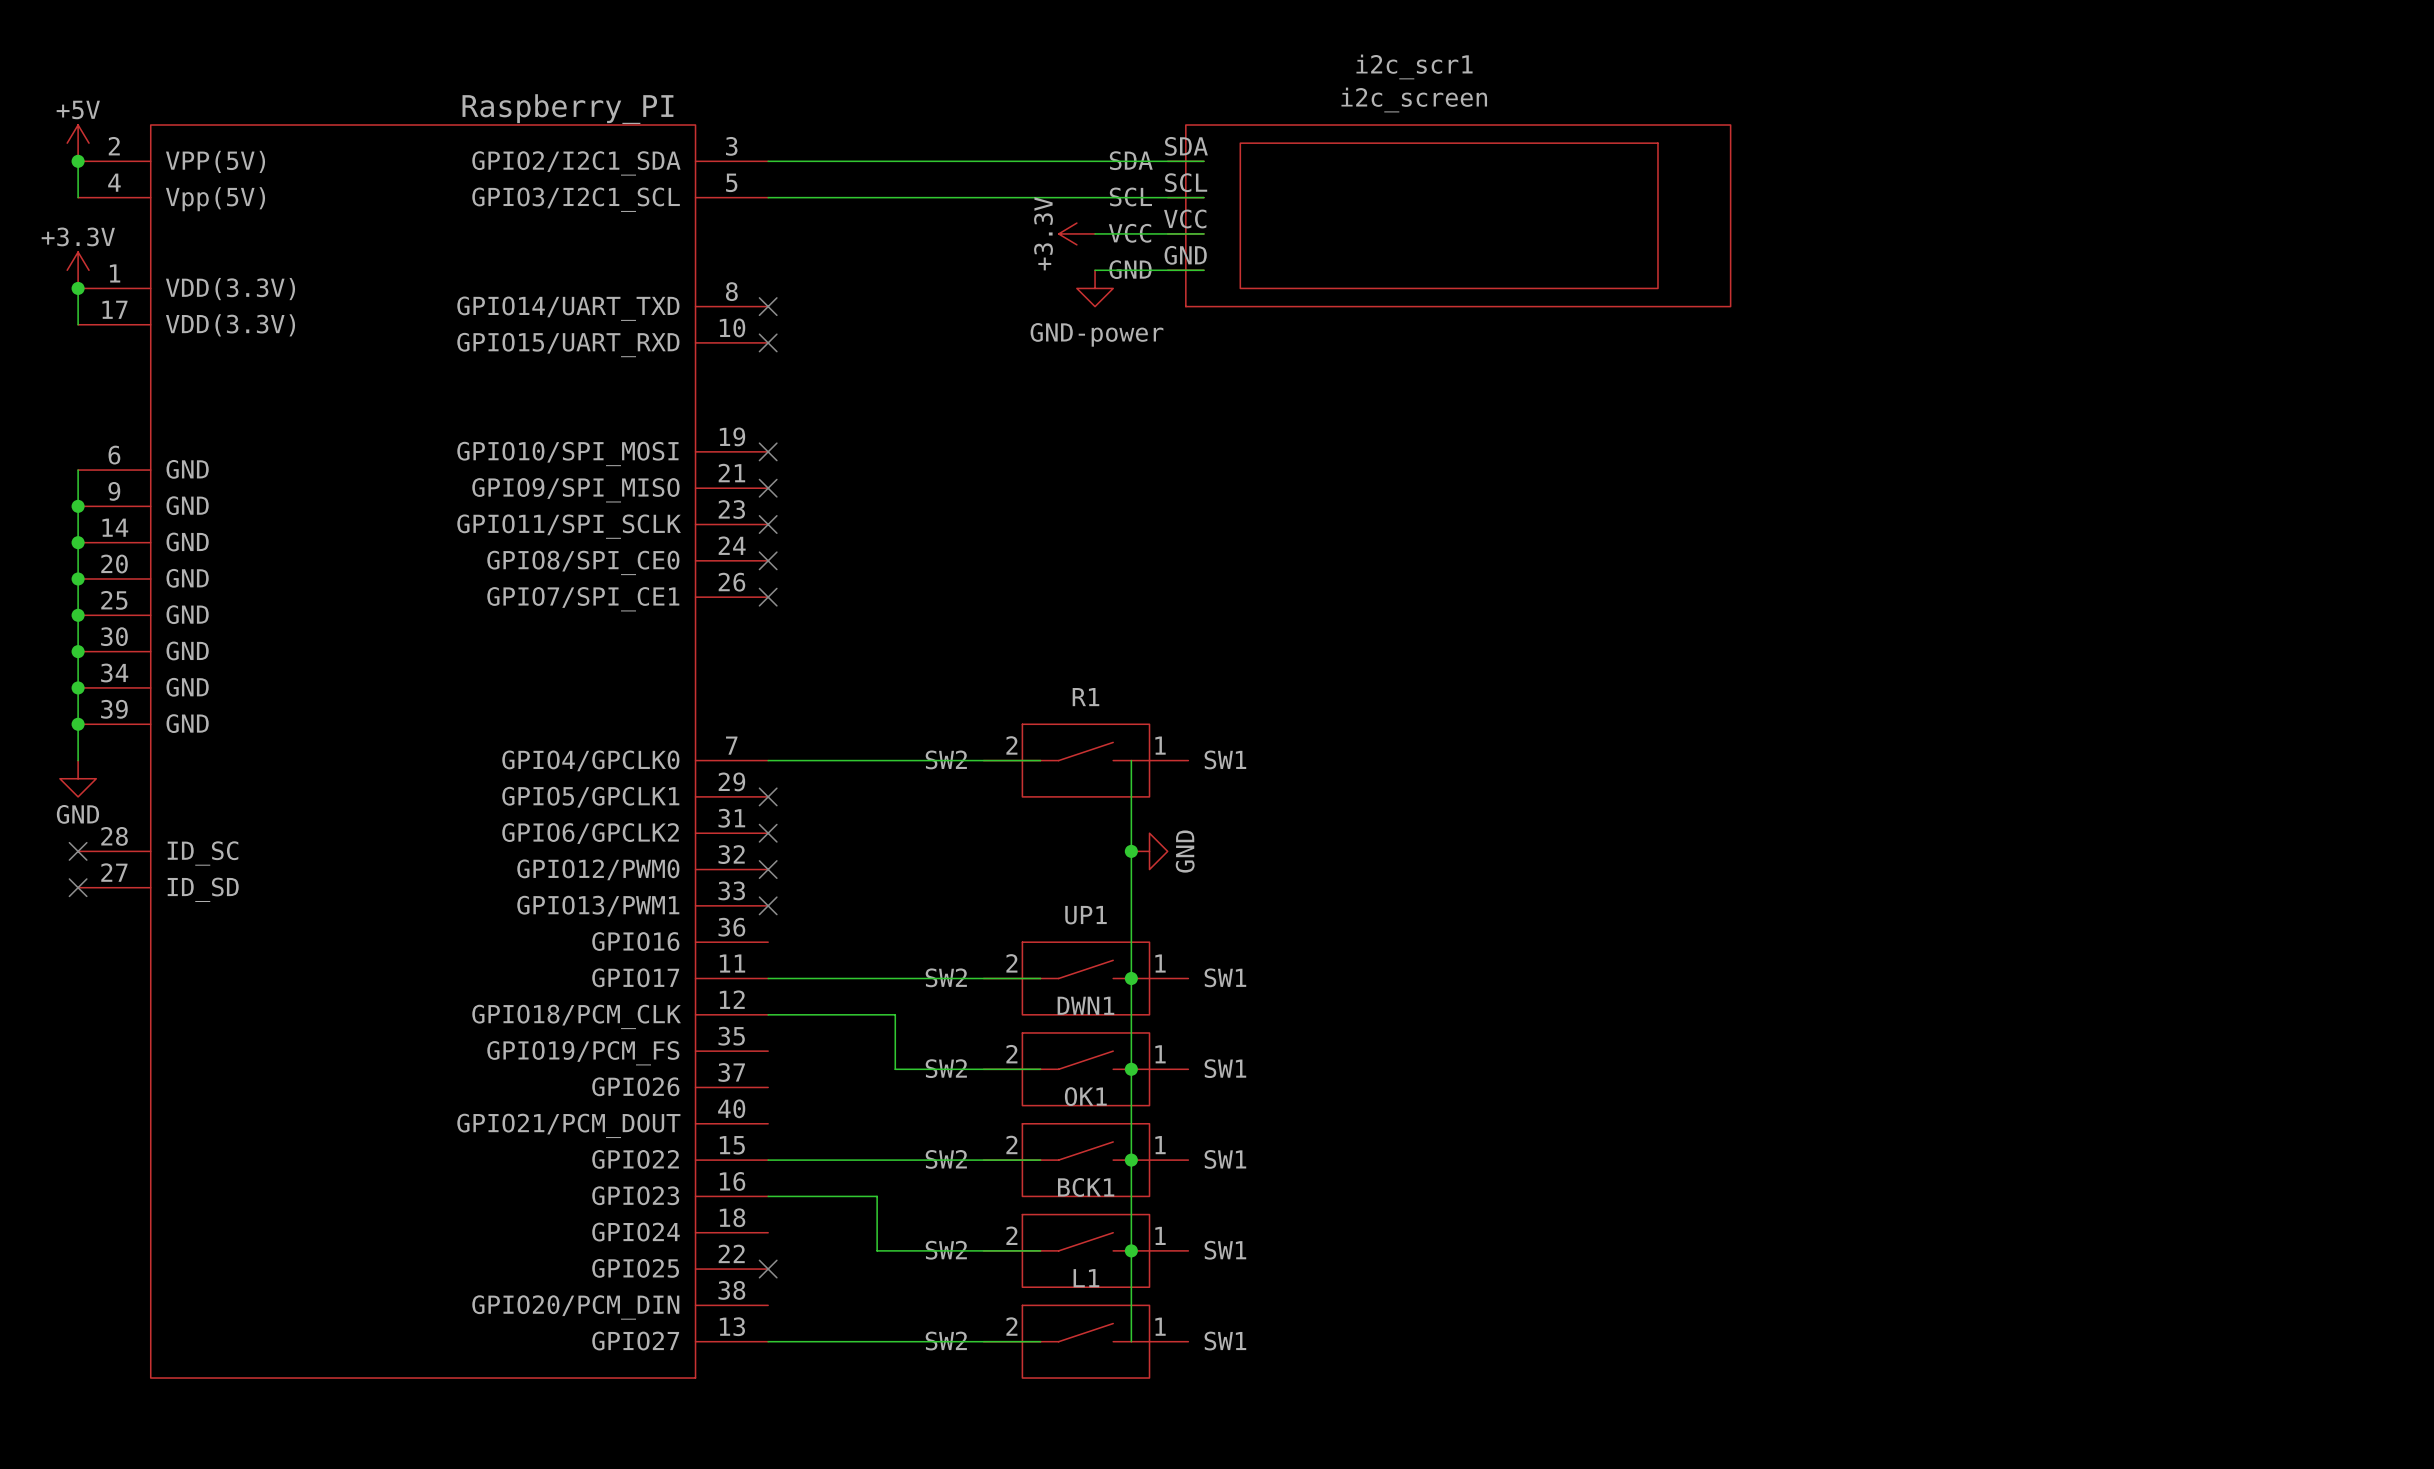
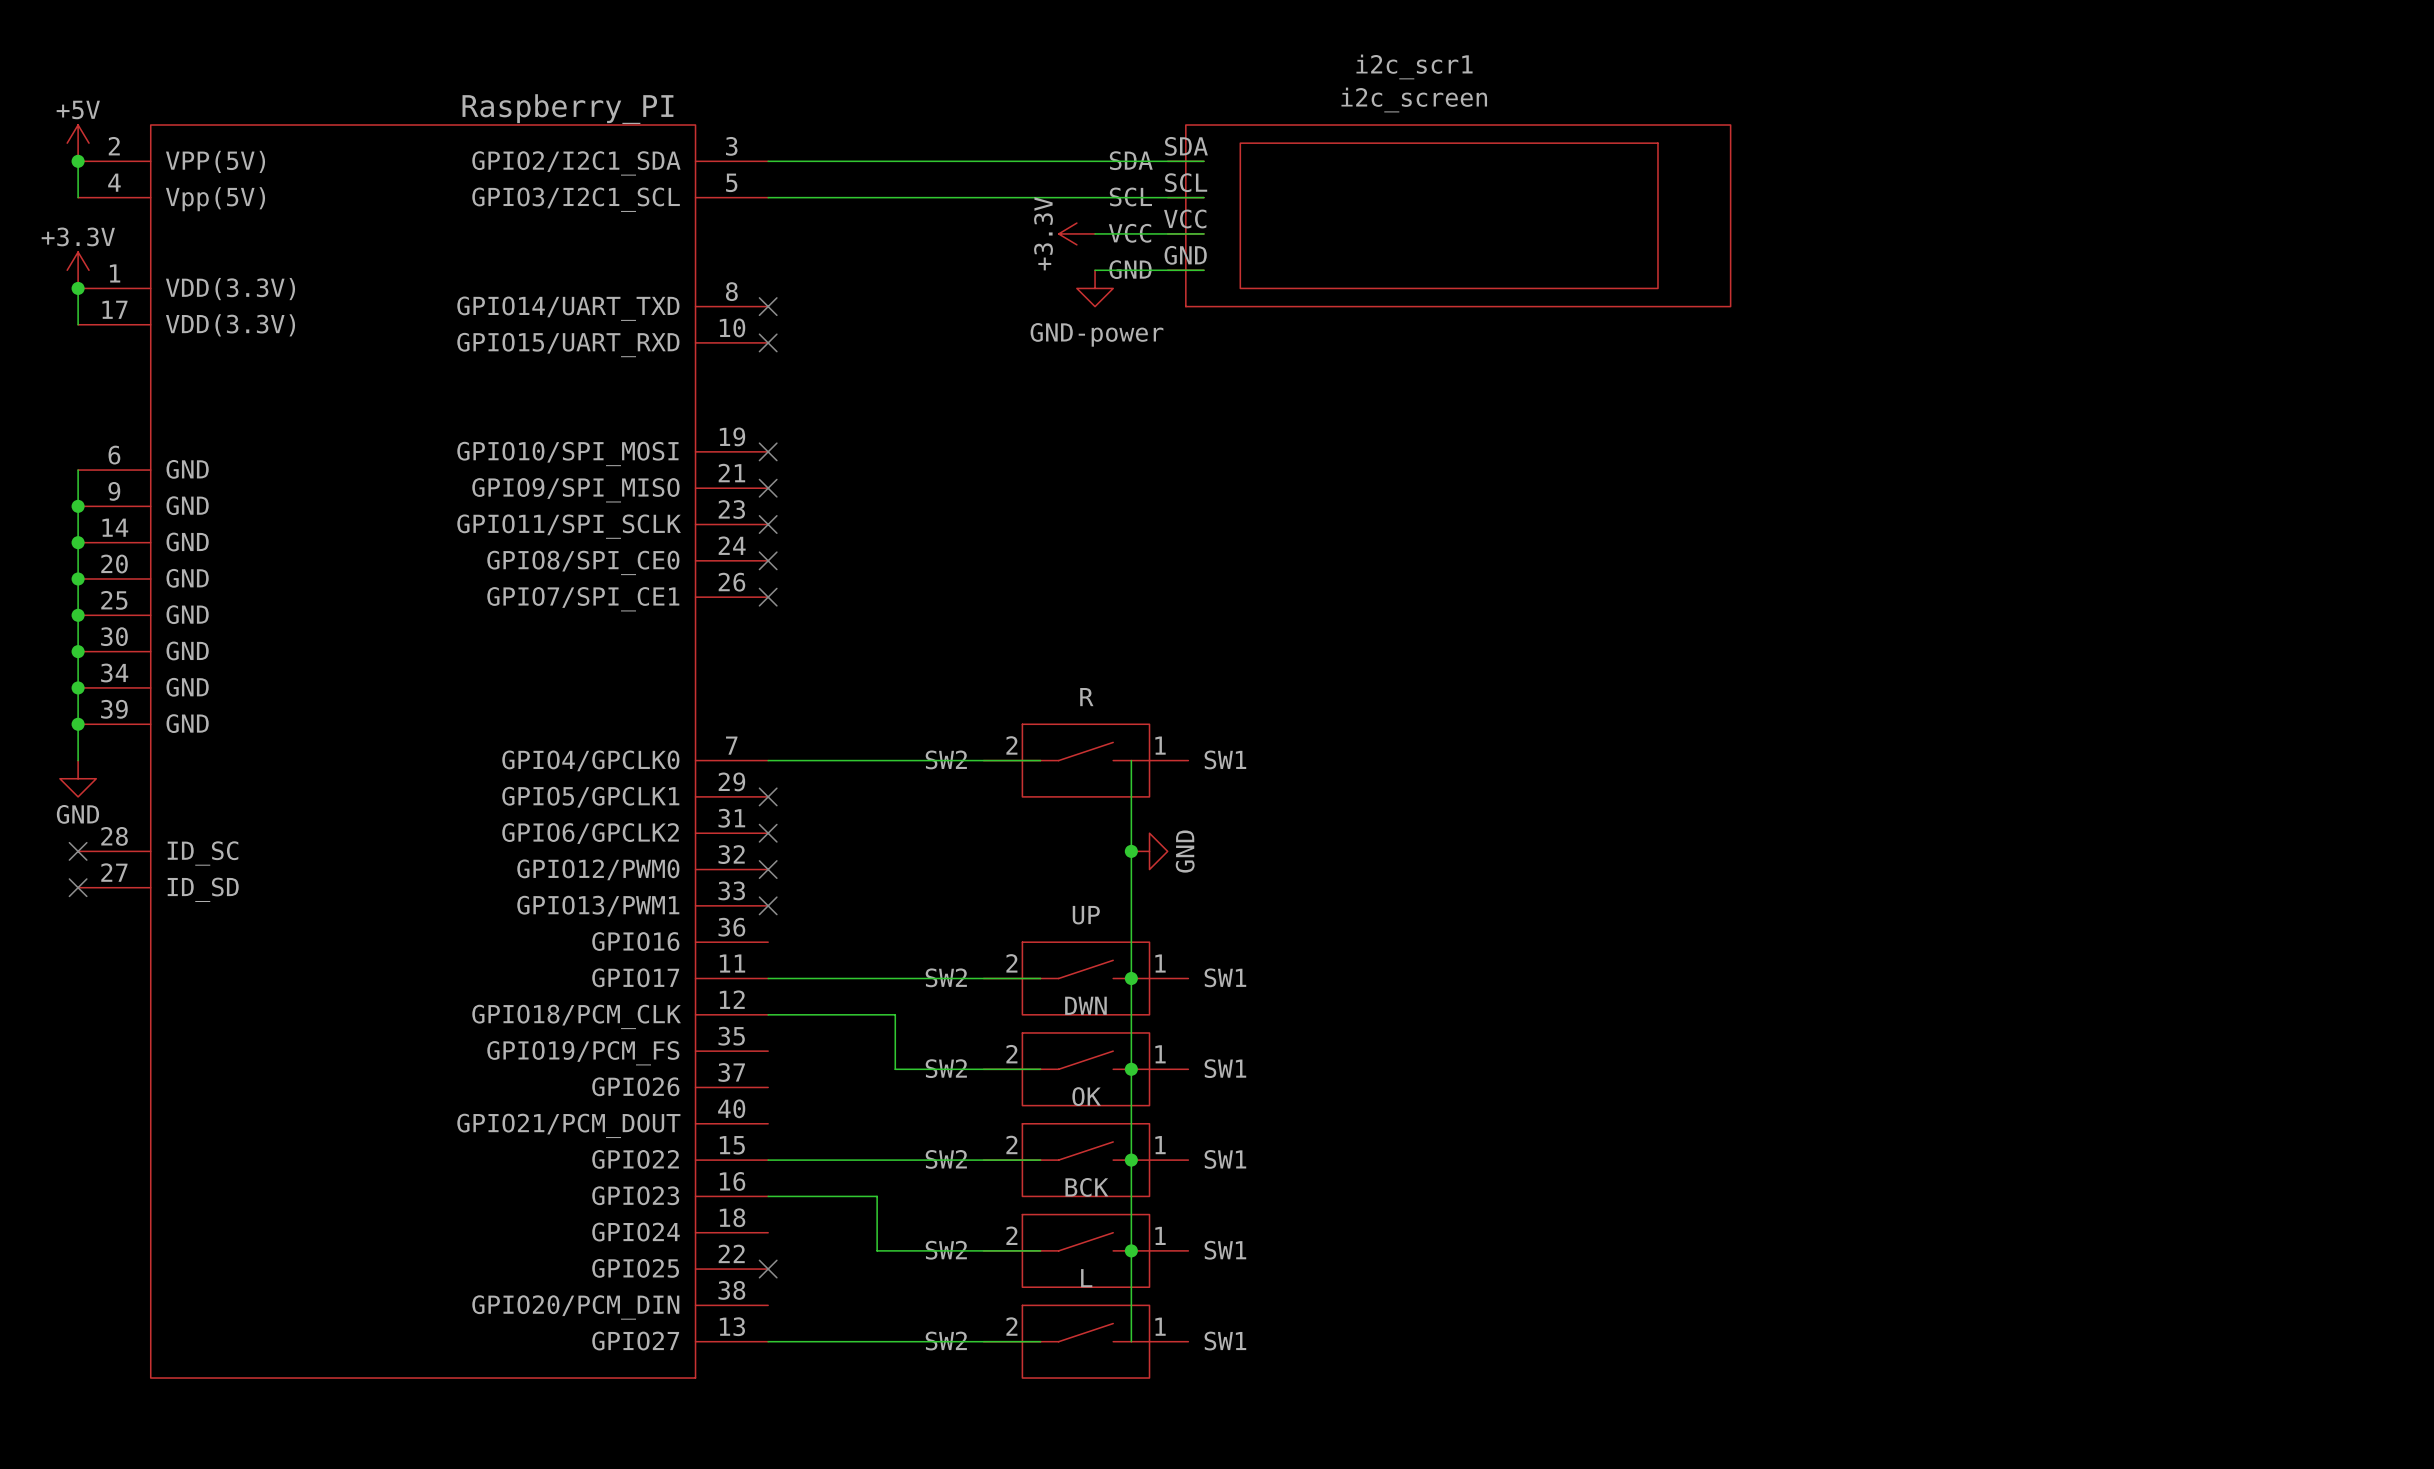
R1 name: R1 (1085, 697) -> R (1086, 697)
UP1 name: UP1 (1086, 915) -> UP (1086, 915)
DWN1 name: DWN1 (1085, 1005) -> DWN (1085, 1005)
OK1 name: OK1 (1085, 1096) -> OK (1086, 1096)
BCK1 name: BCK1 (1086, 1187) -> BCK (1086, 1187)
L1 name: L1 (1086, 1278) -> L (1086, 1278)

